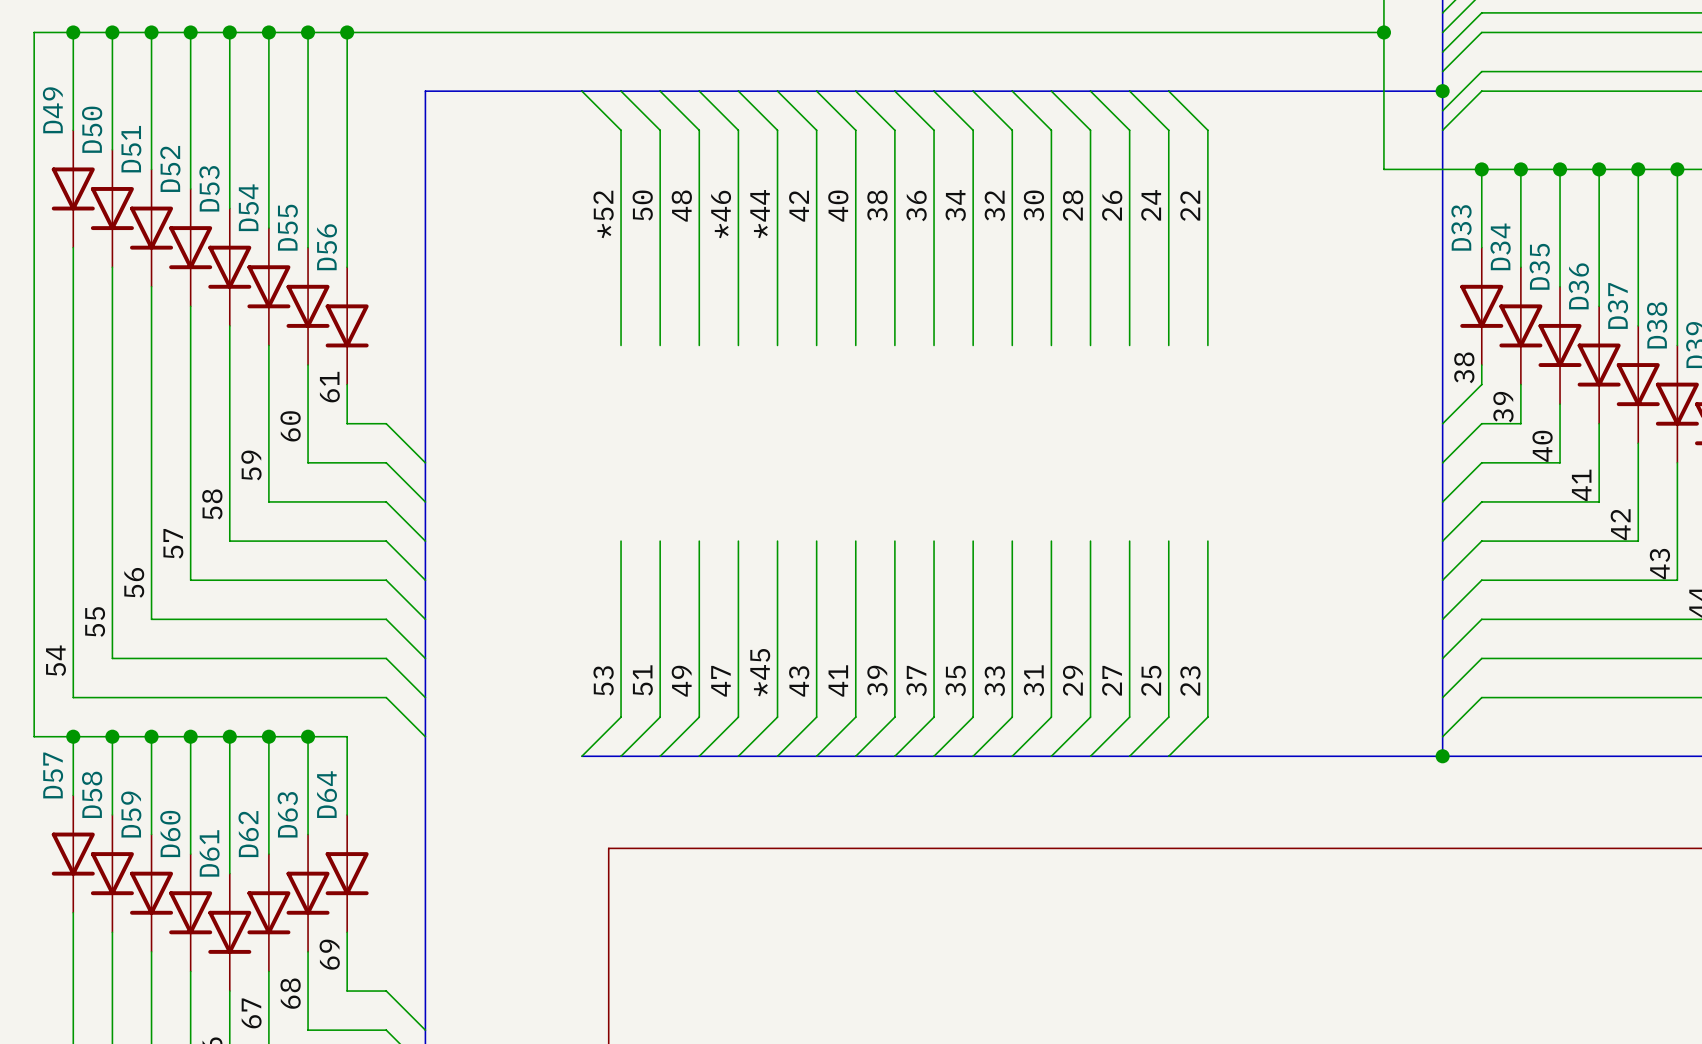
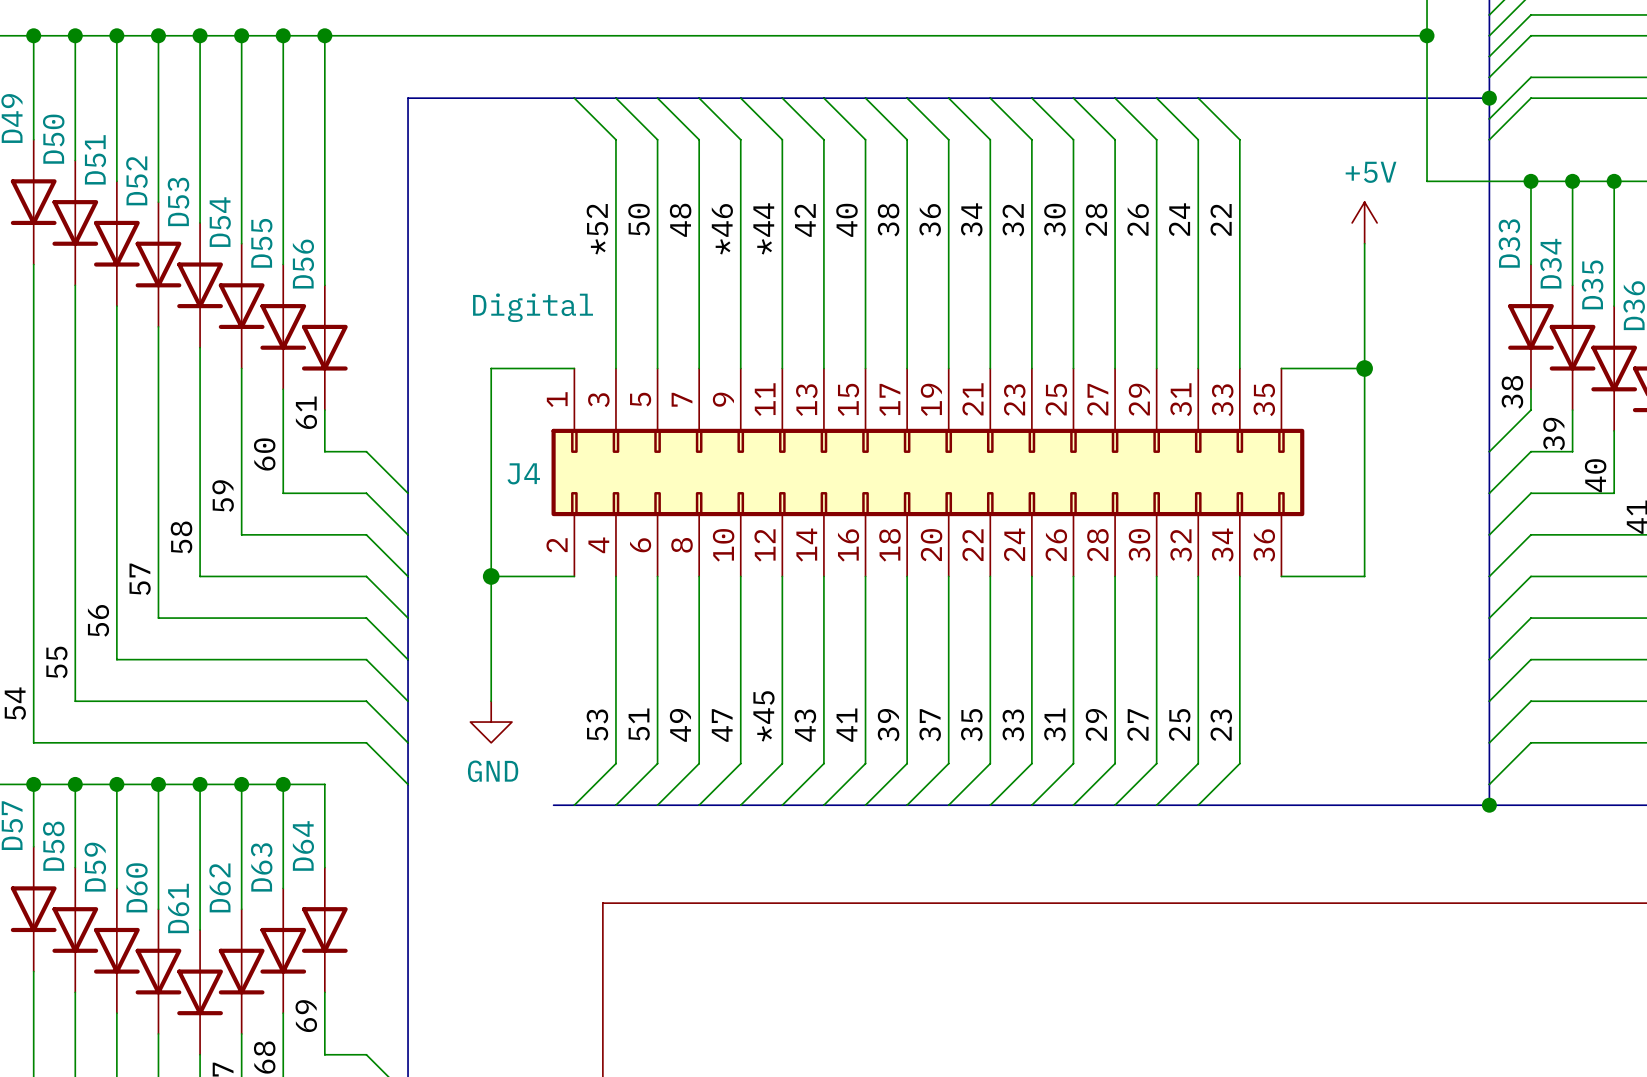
power symbol: none -> +5V (1364, 222)
wire: none -> (1364, 243) (1364, 576) (1281, 576)
wire: none -> (574, 368) (491, 368) (491, 701)
wire: none -> (1281, 368) (1364, 368)
junction: none -> (1364, 368)
J4: none -> Digital (927, 472)
wire: none -> (491, 576) (574, 576)
junction: none -> (491, 576)
power symbol: none -> GND (491, 722)
bus: none -> (553, 805) (574, 805)

